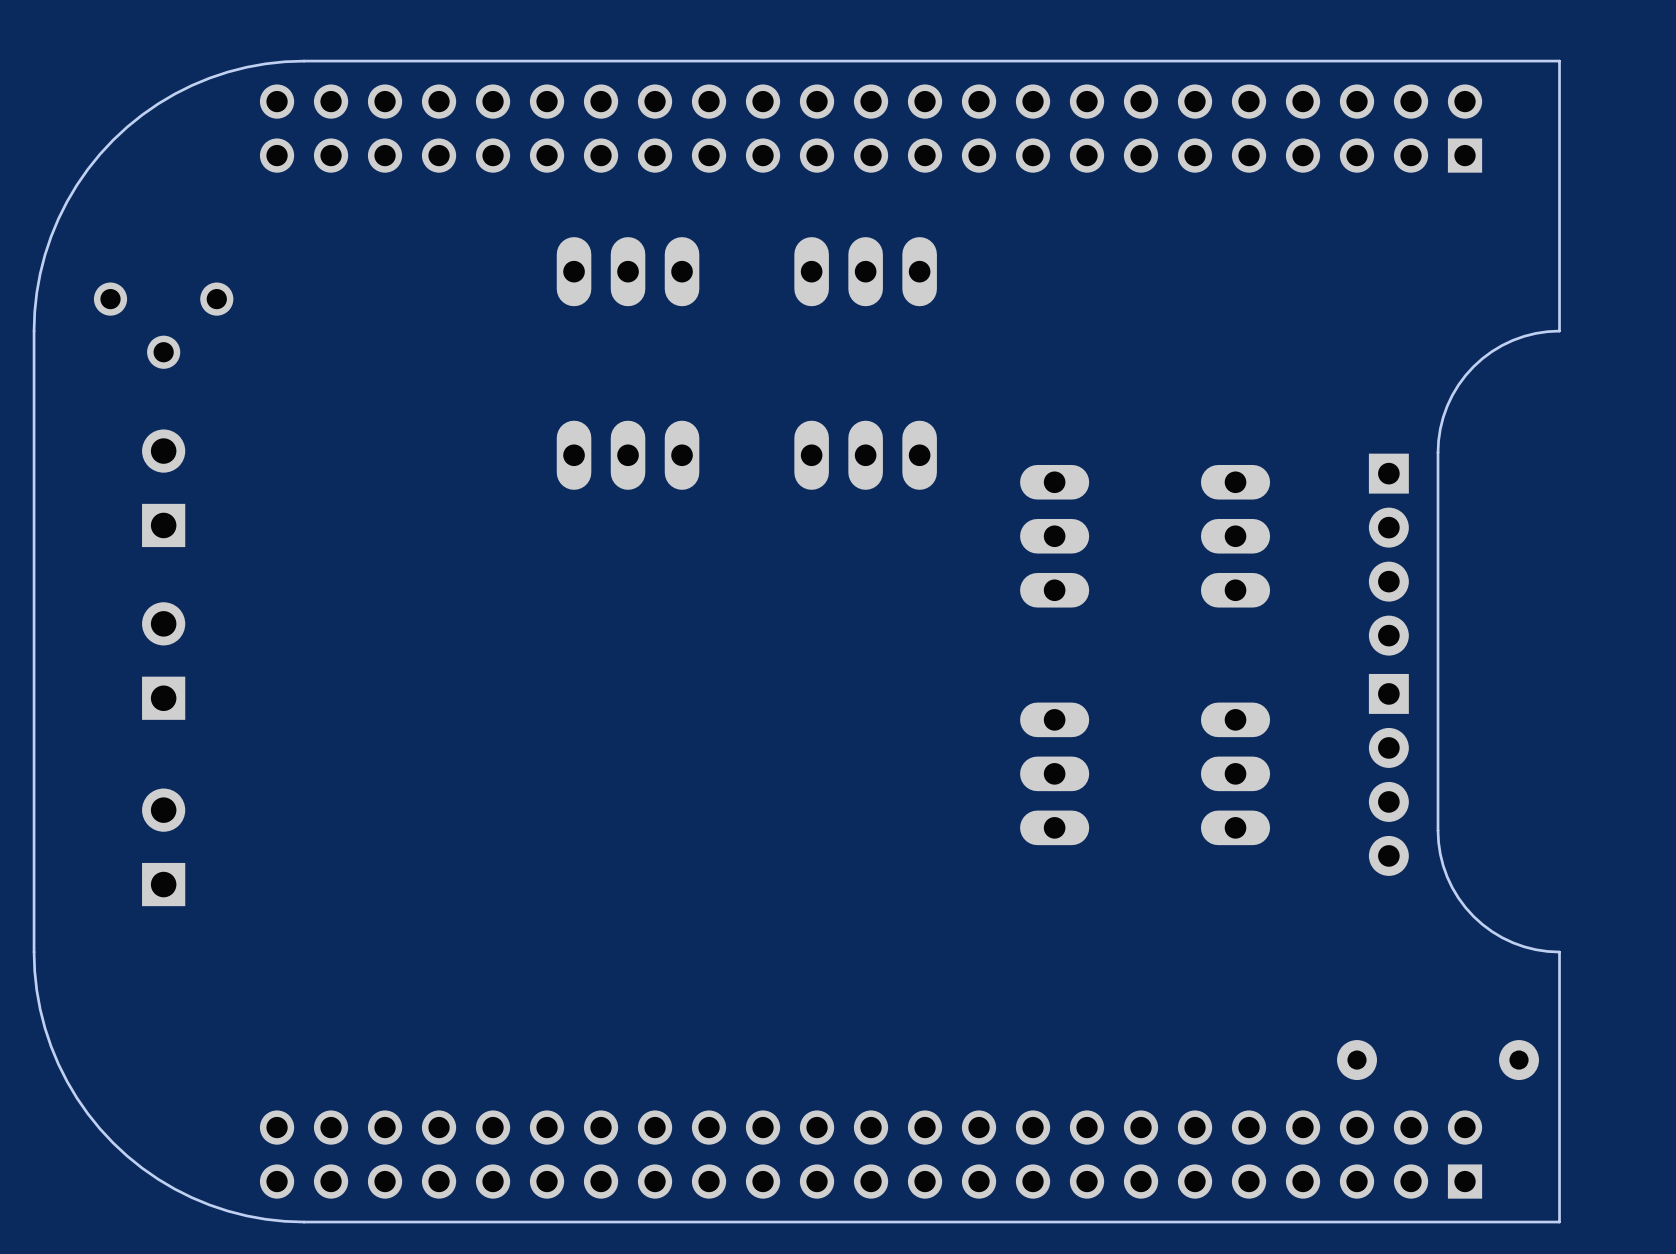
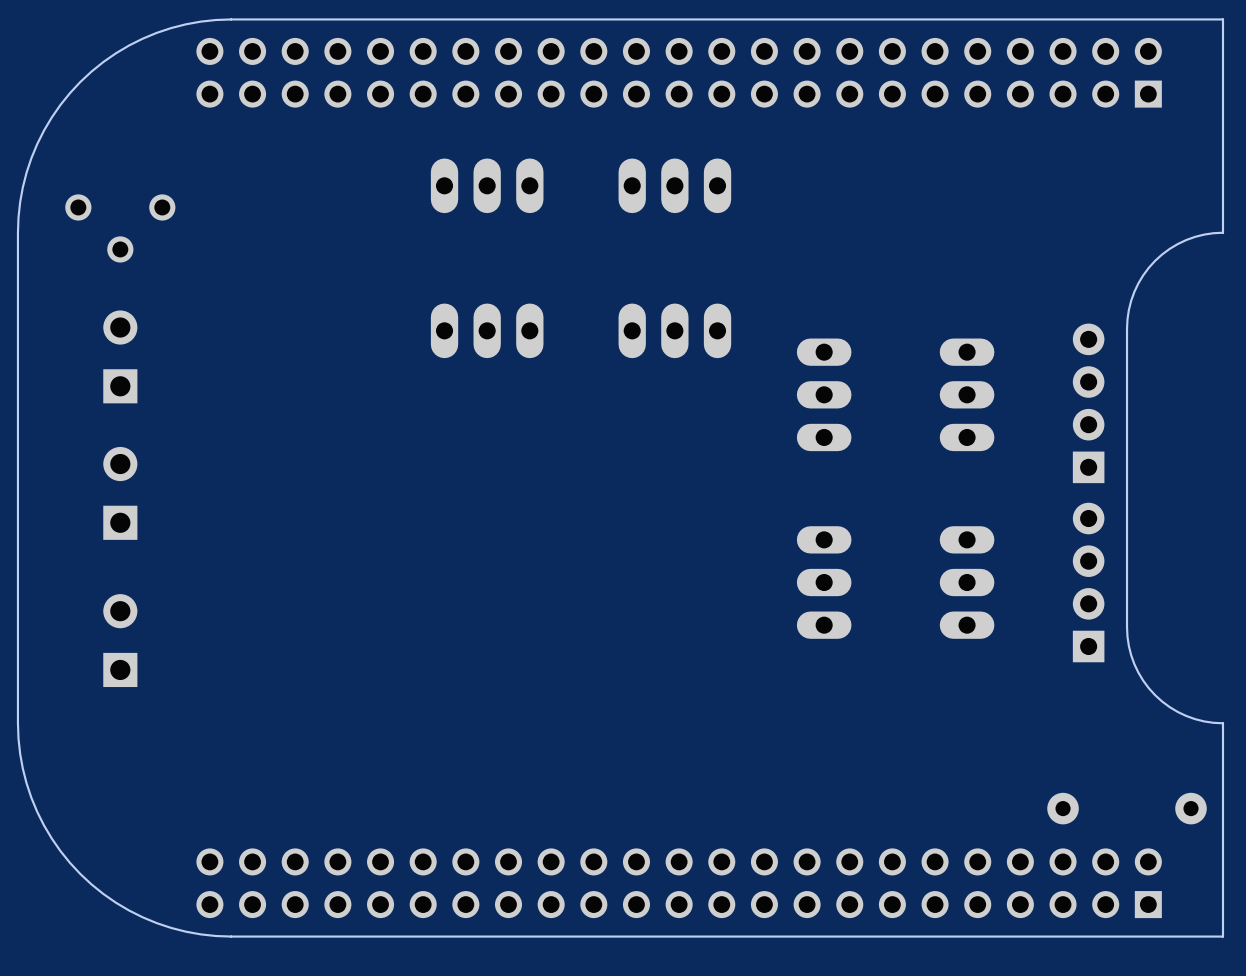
part rotation: 0° (1388, 554) -> 180° (1088, 403)
part rotation: 0° (1388, 774) -> 180° (1088, 582)

